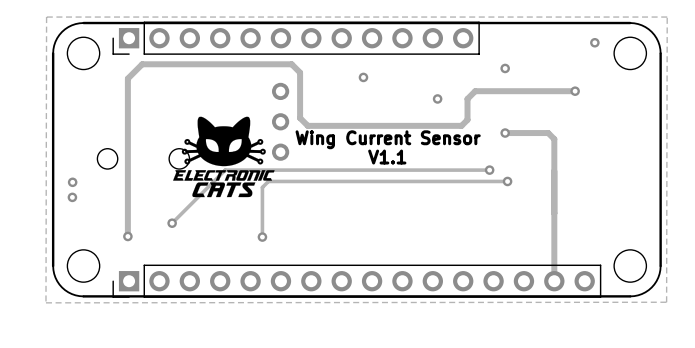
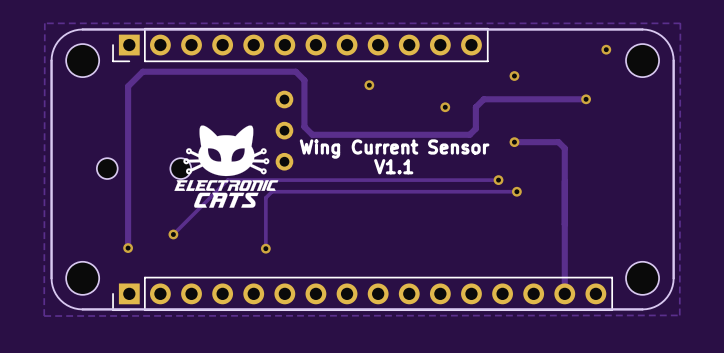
via: (72, 182) -> none
via: (72, 197) -> none

